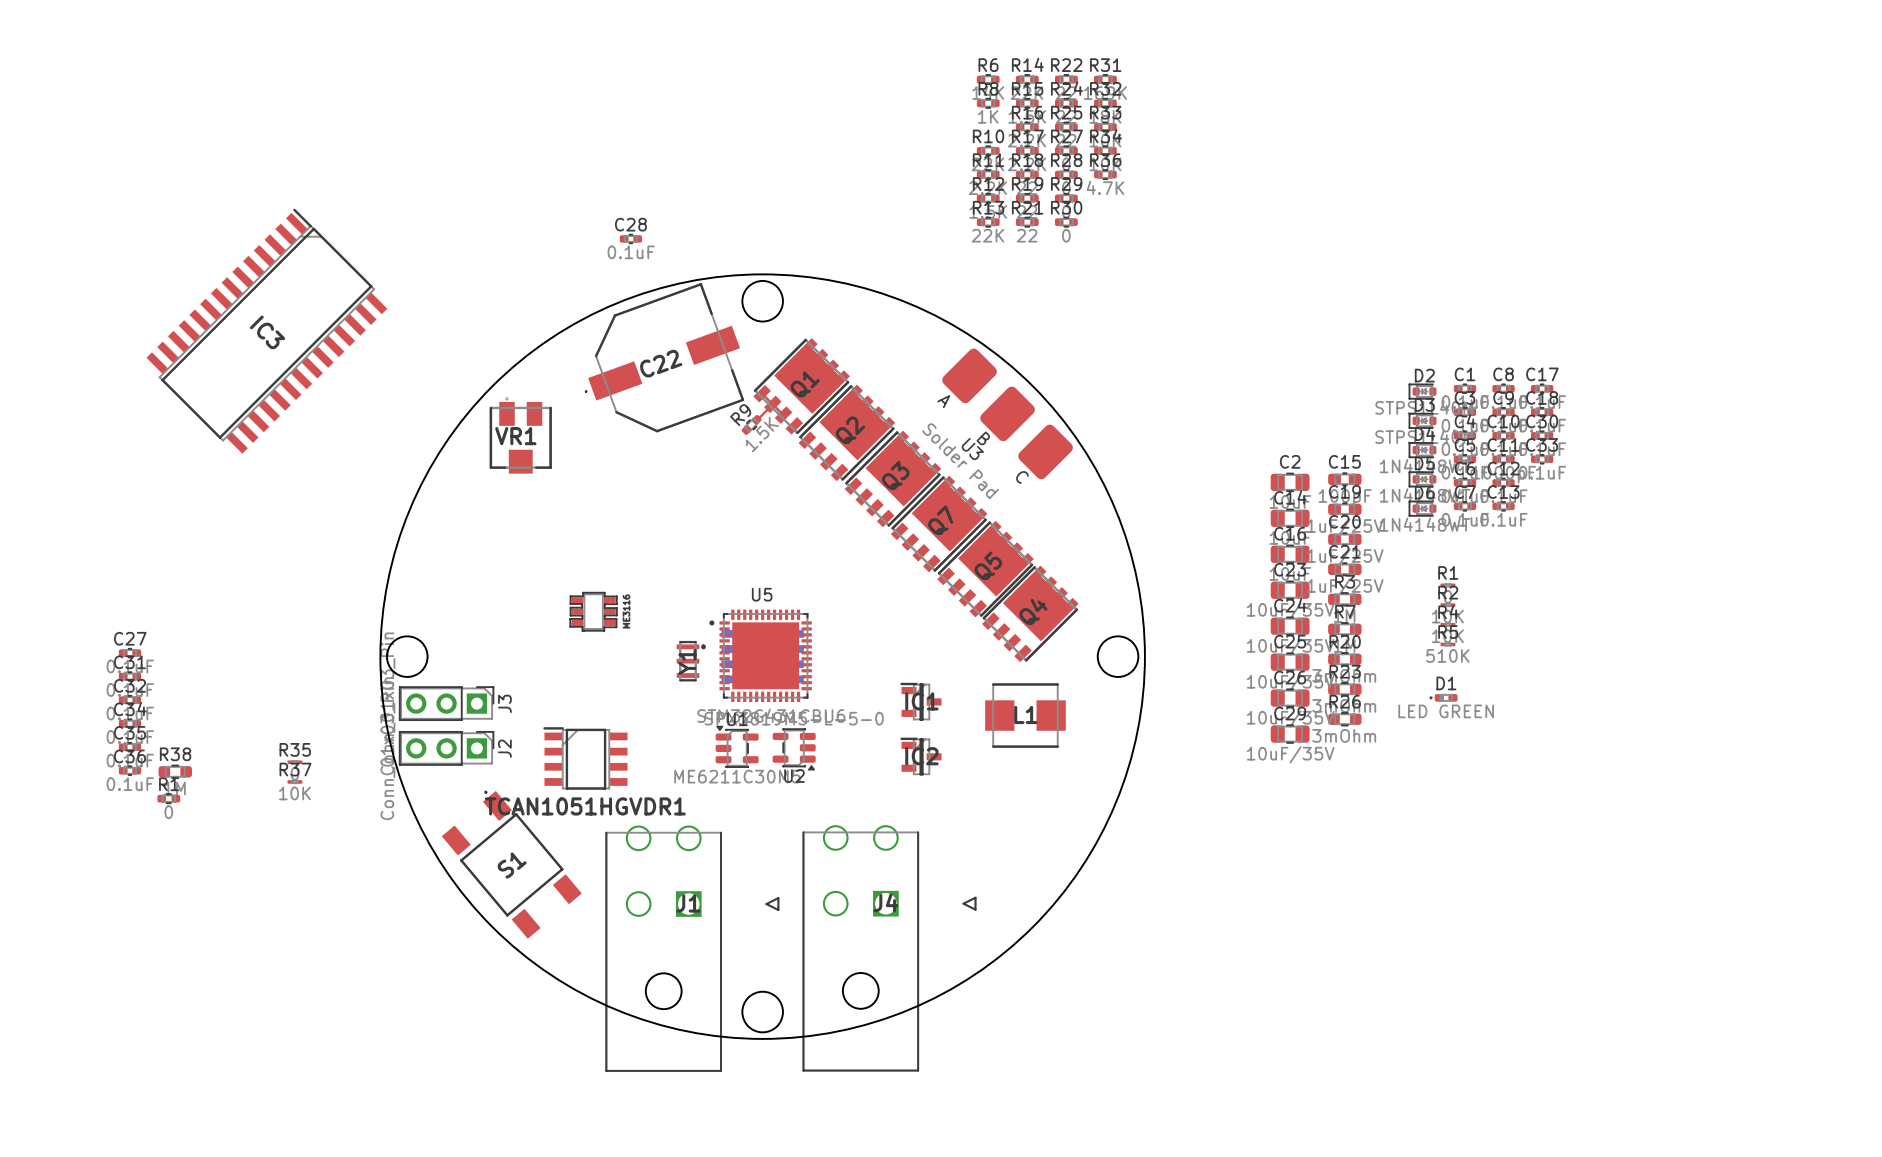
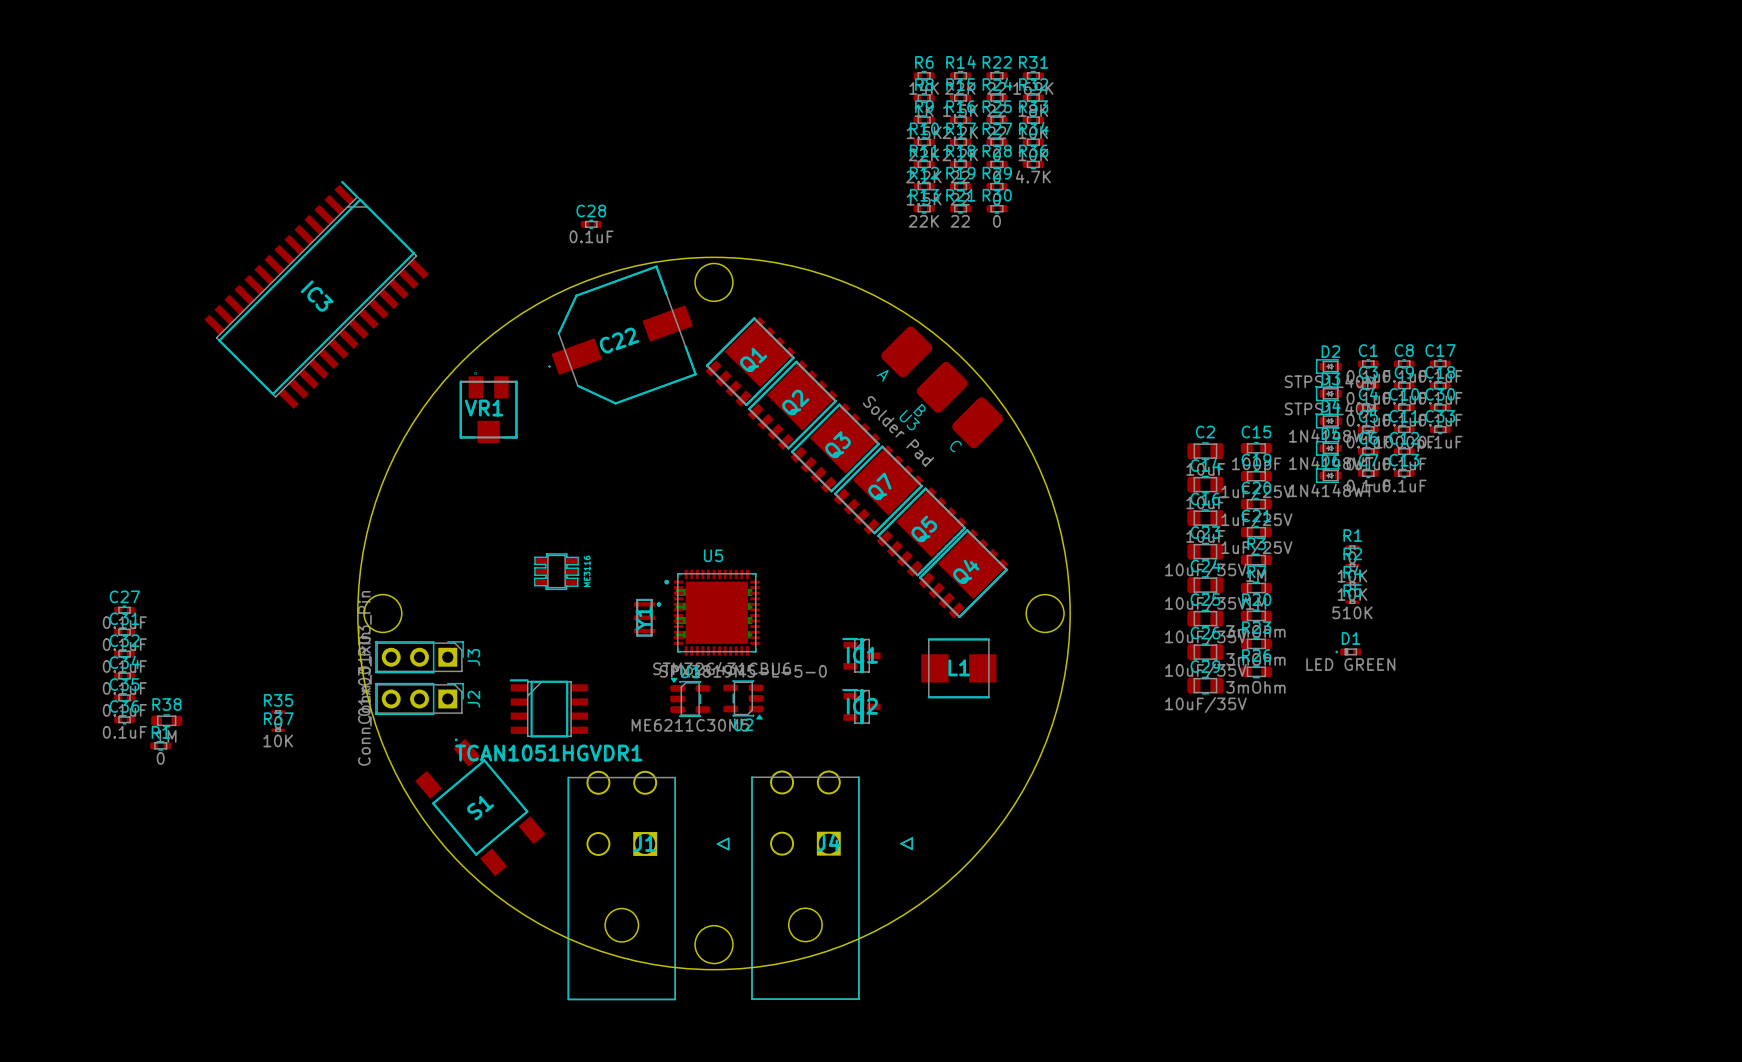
IC3 position: (266, 331) -> (316, 294)
top track: (762, 393) (783, 415) -> none
top track: (772, 404) (756, 419) -> none
R9 rotation: 0° (751, 424) -> 45° clockwise (924, 120)
R9 position: (751, 424) -> (924, 120)

